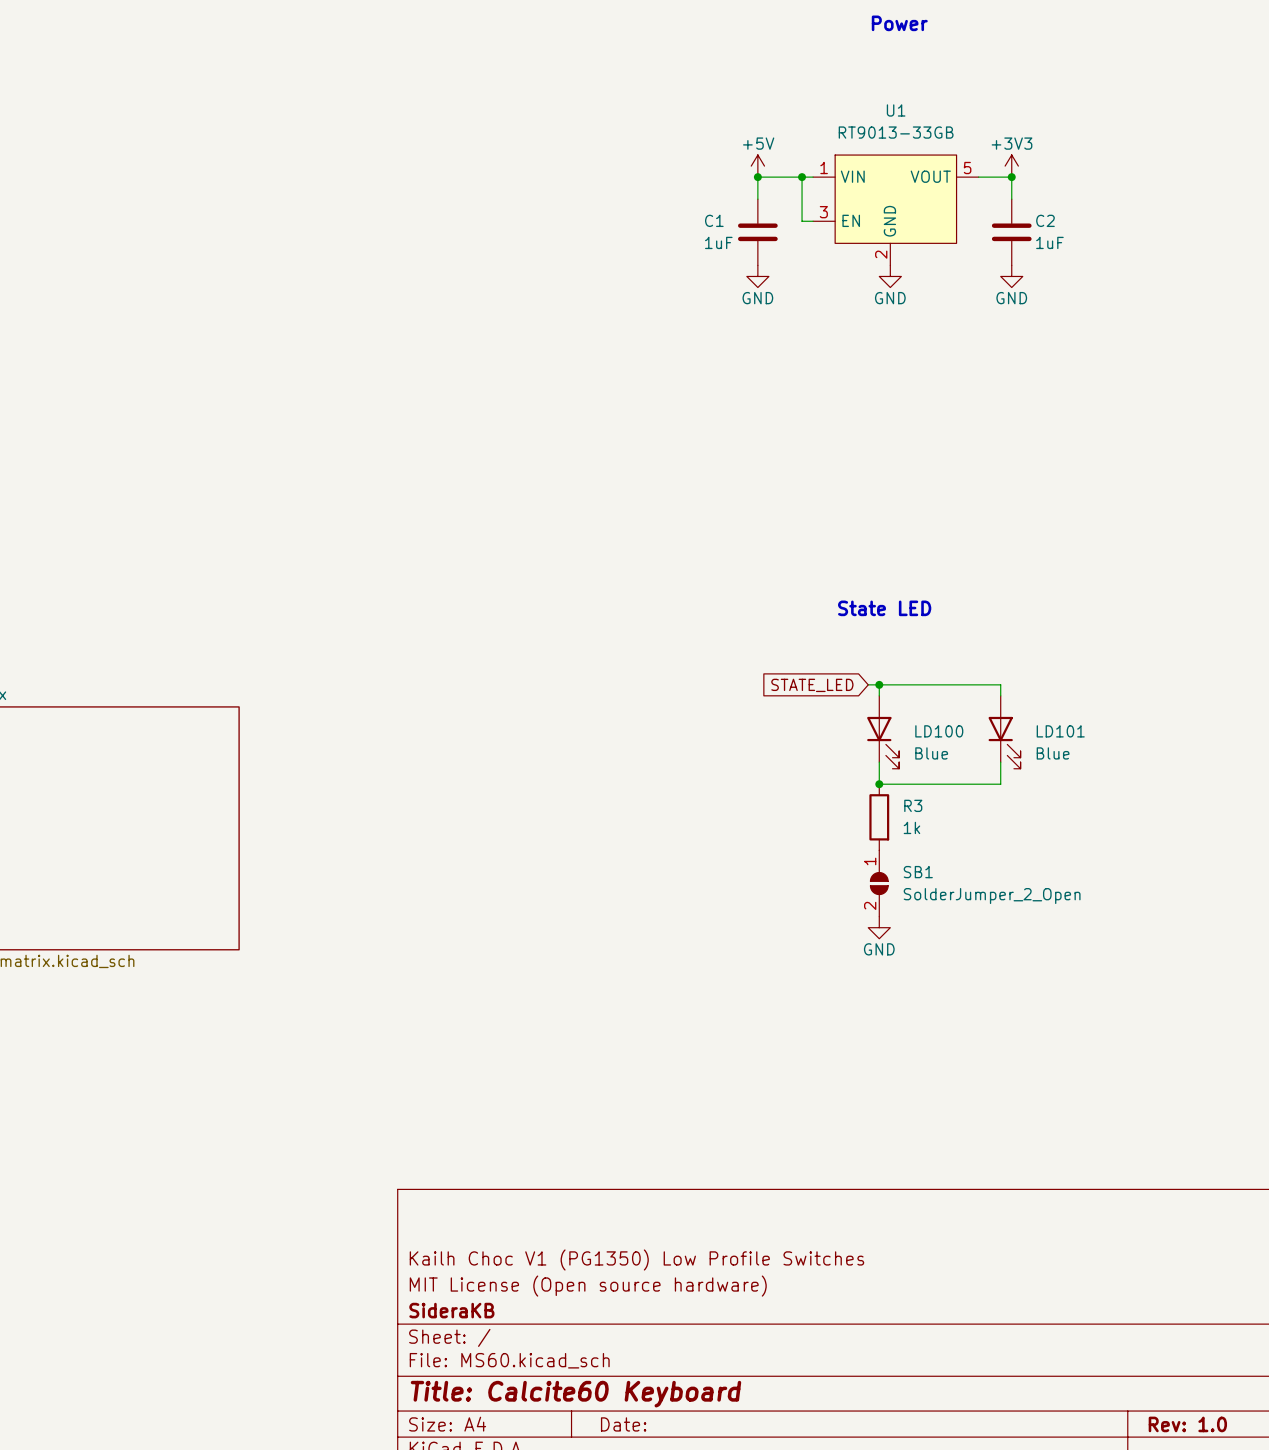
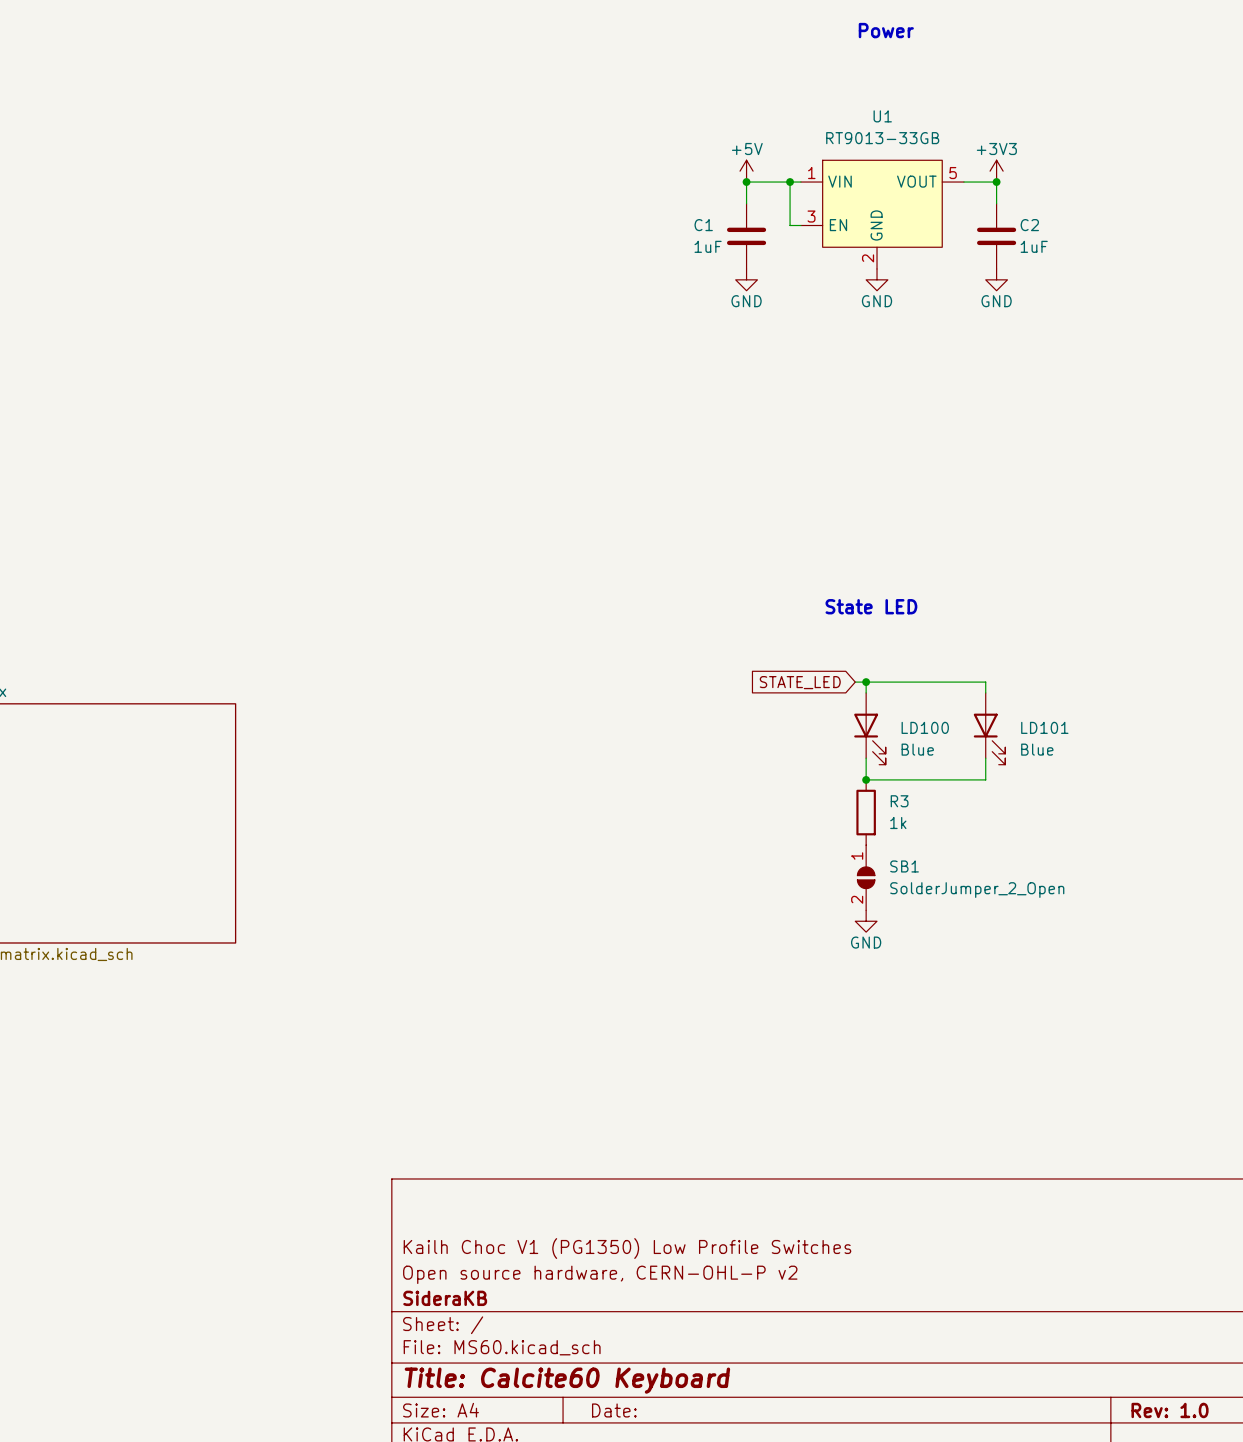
title block: MIT License (Open source hardware) (588, 1286) -> Open source hardware, CERN-OHL-P v2 (600, 1274)

